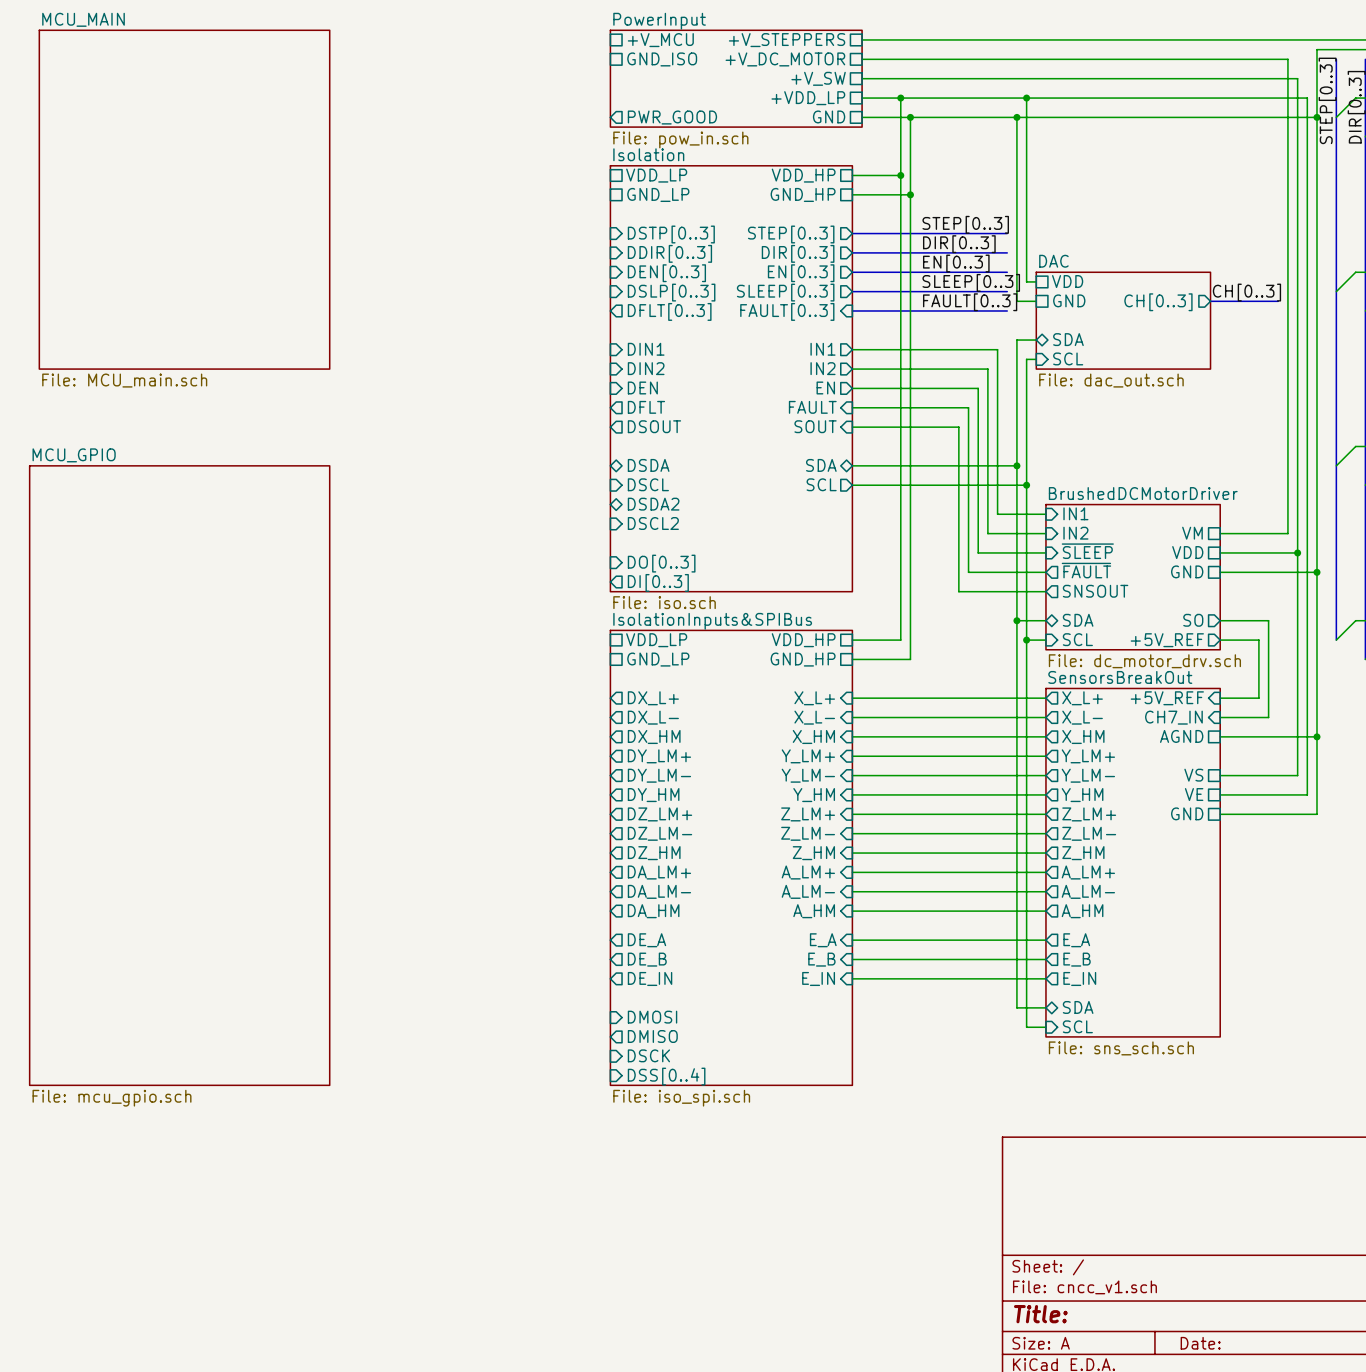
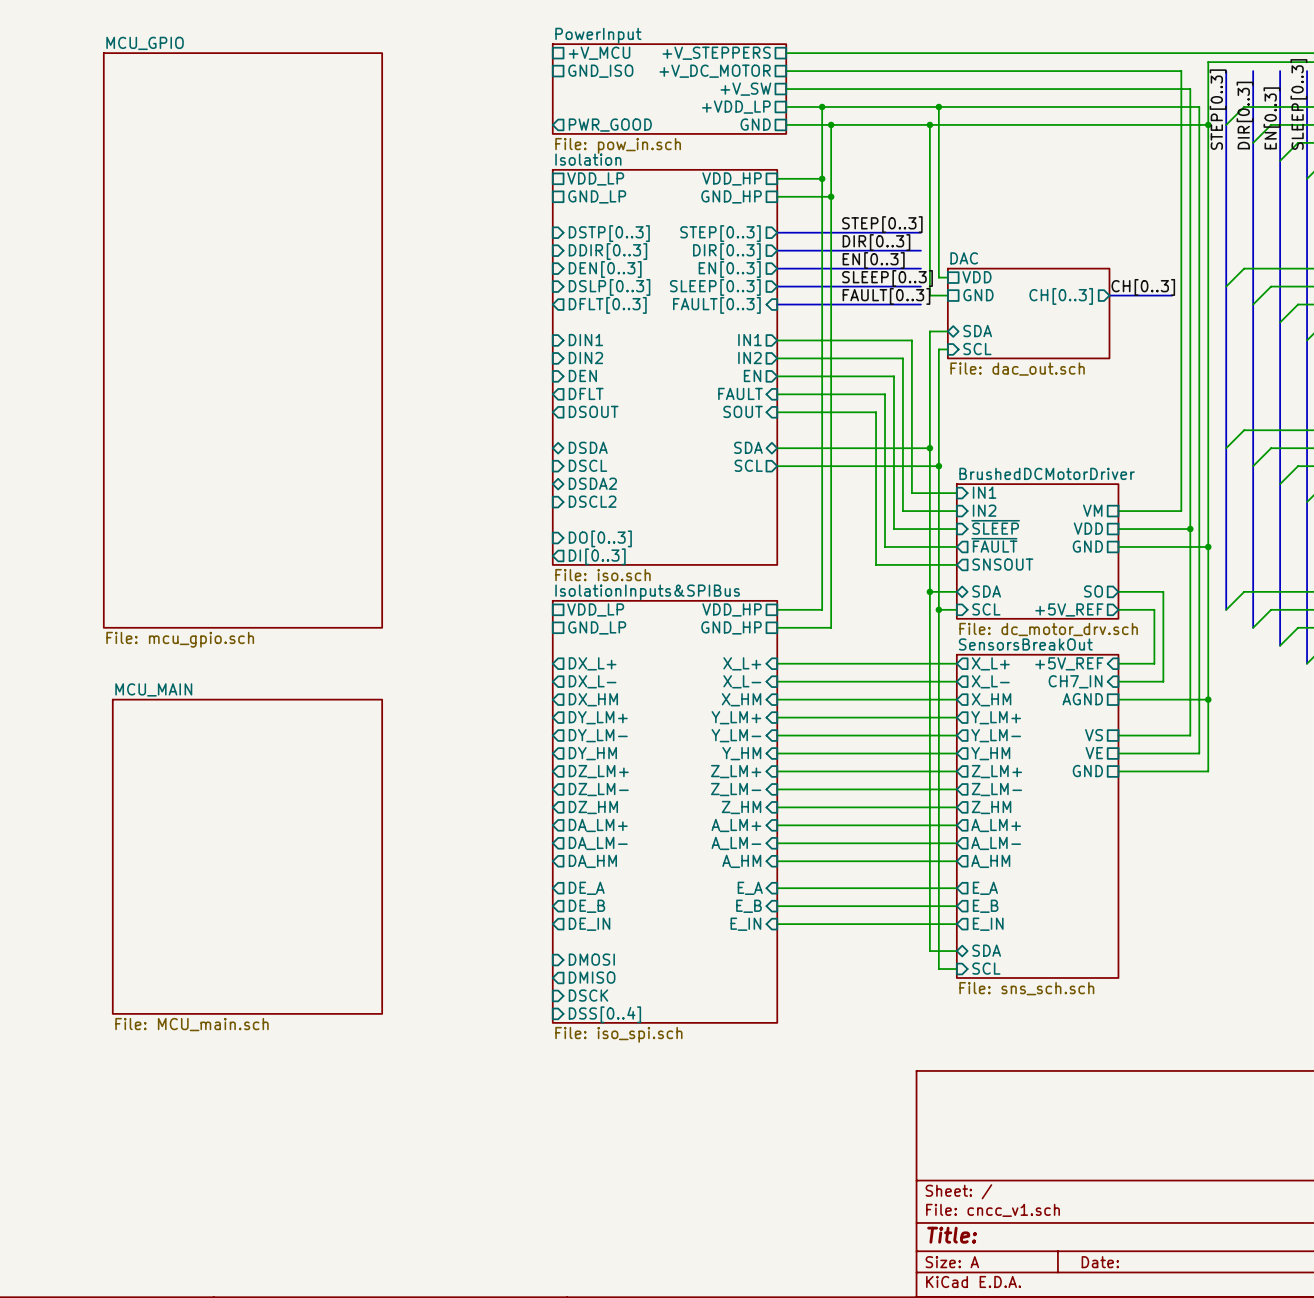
sheet MCU_MAIN: File: MCU_main.sch (184, 199) -> none
sheet MCU_GPIO: none -> File: mcu_gpio.sch (242, 340)
sheet MCU_GPIO: File: mcu_gpio.sch (179, 775) -> none
sheet MCU_MAIN: none -> File: MCU_main.sch (247, 856)

